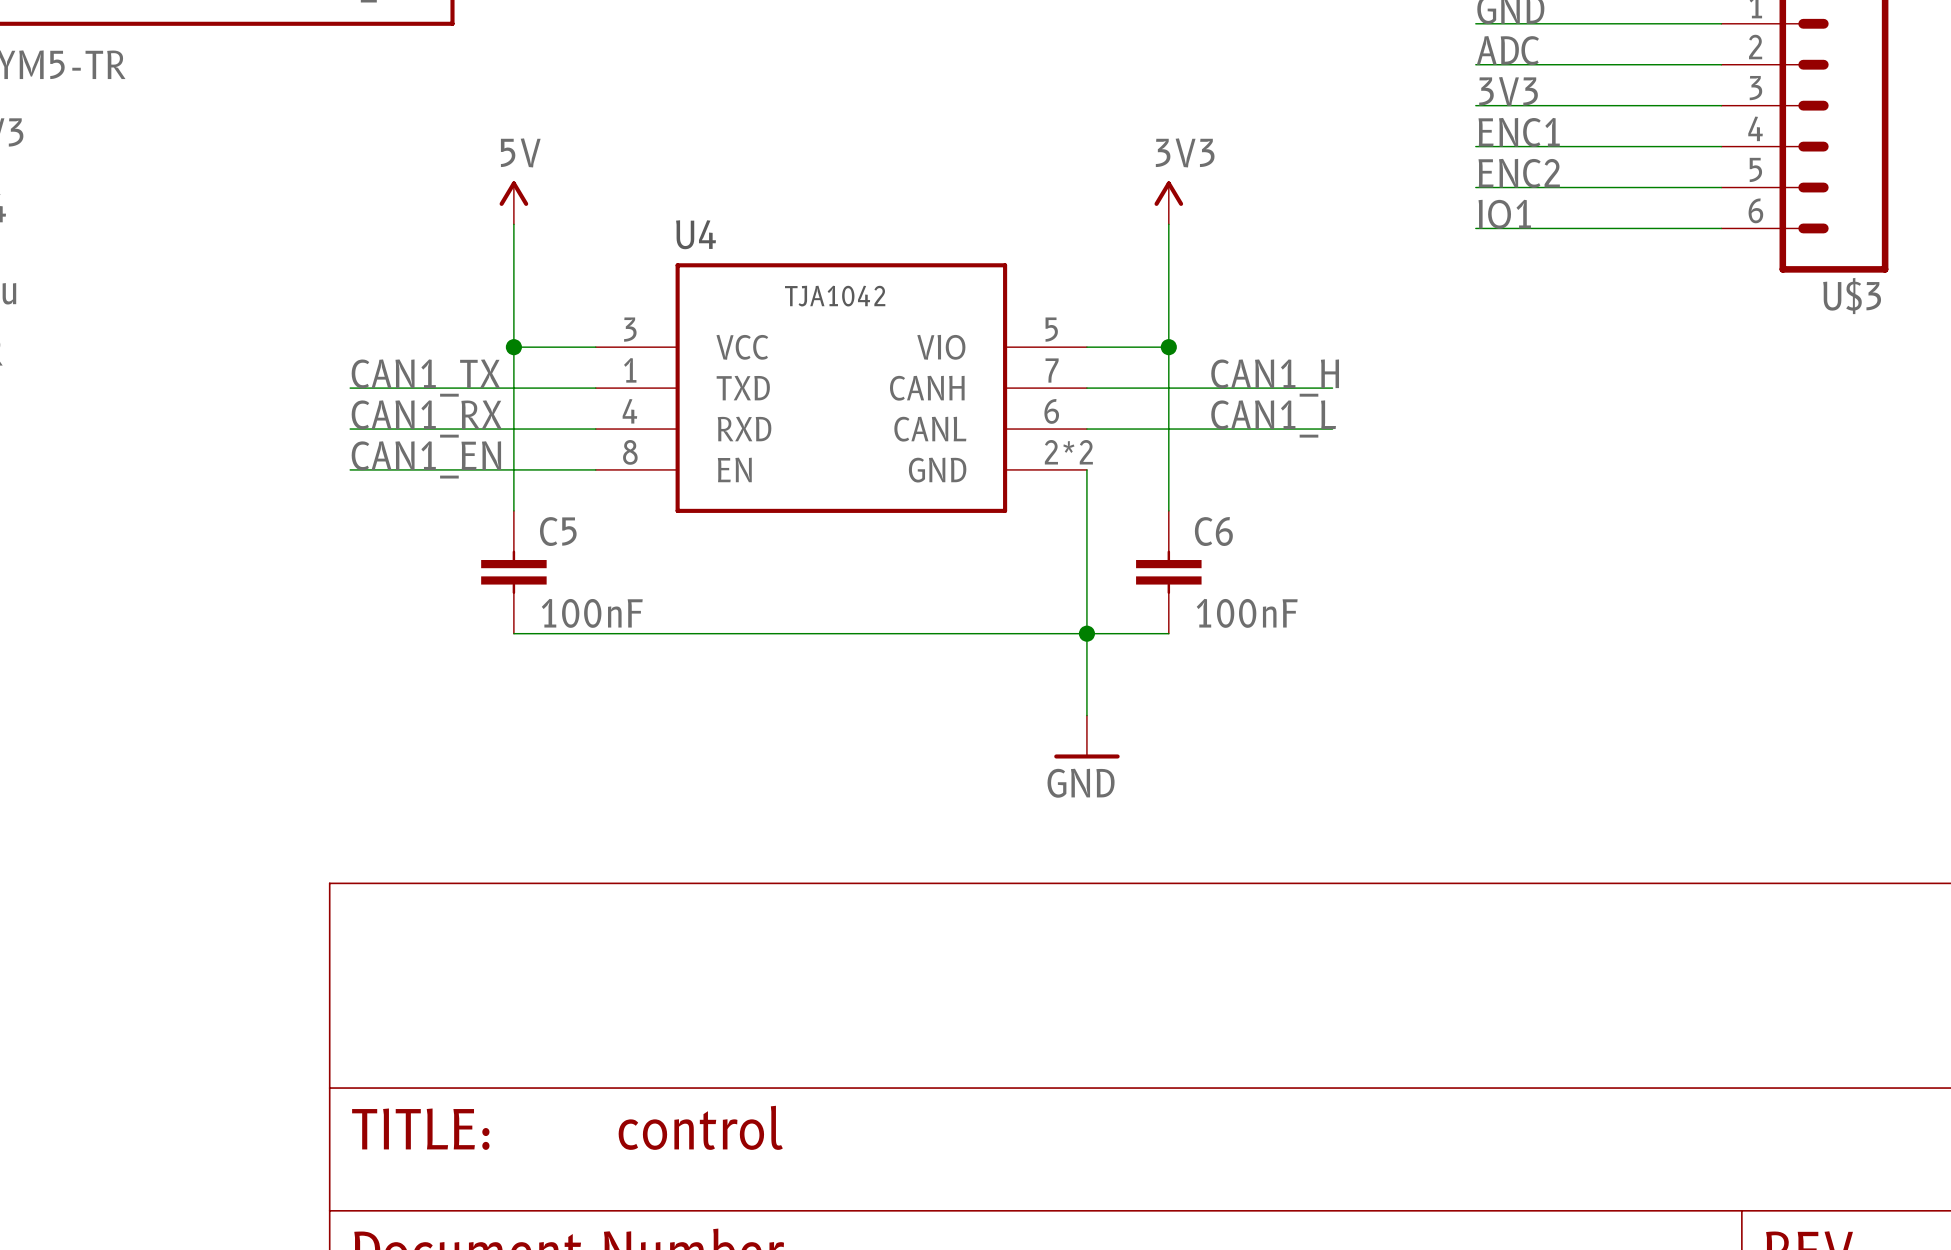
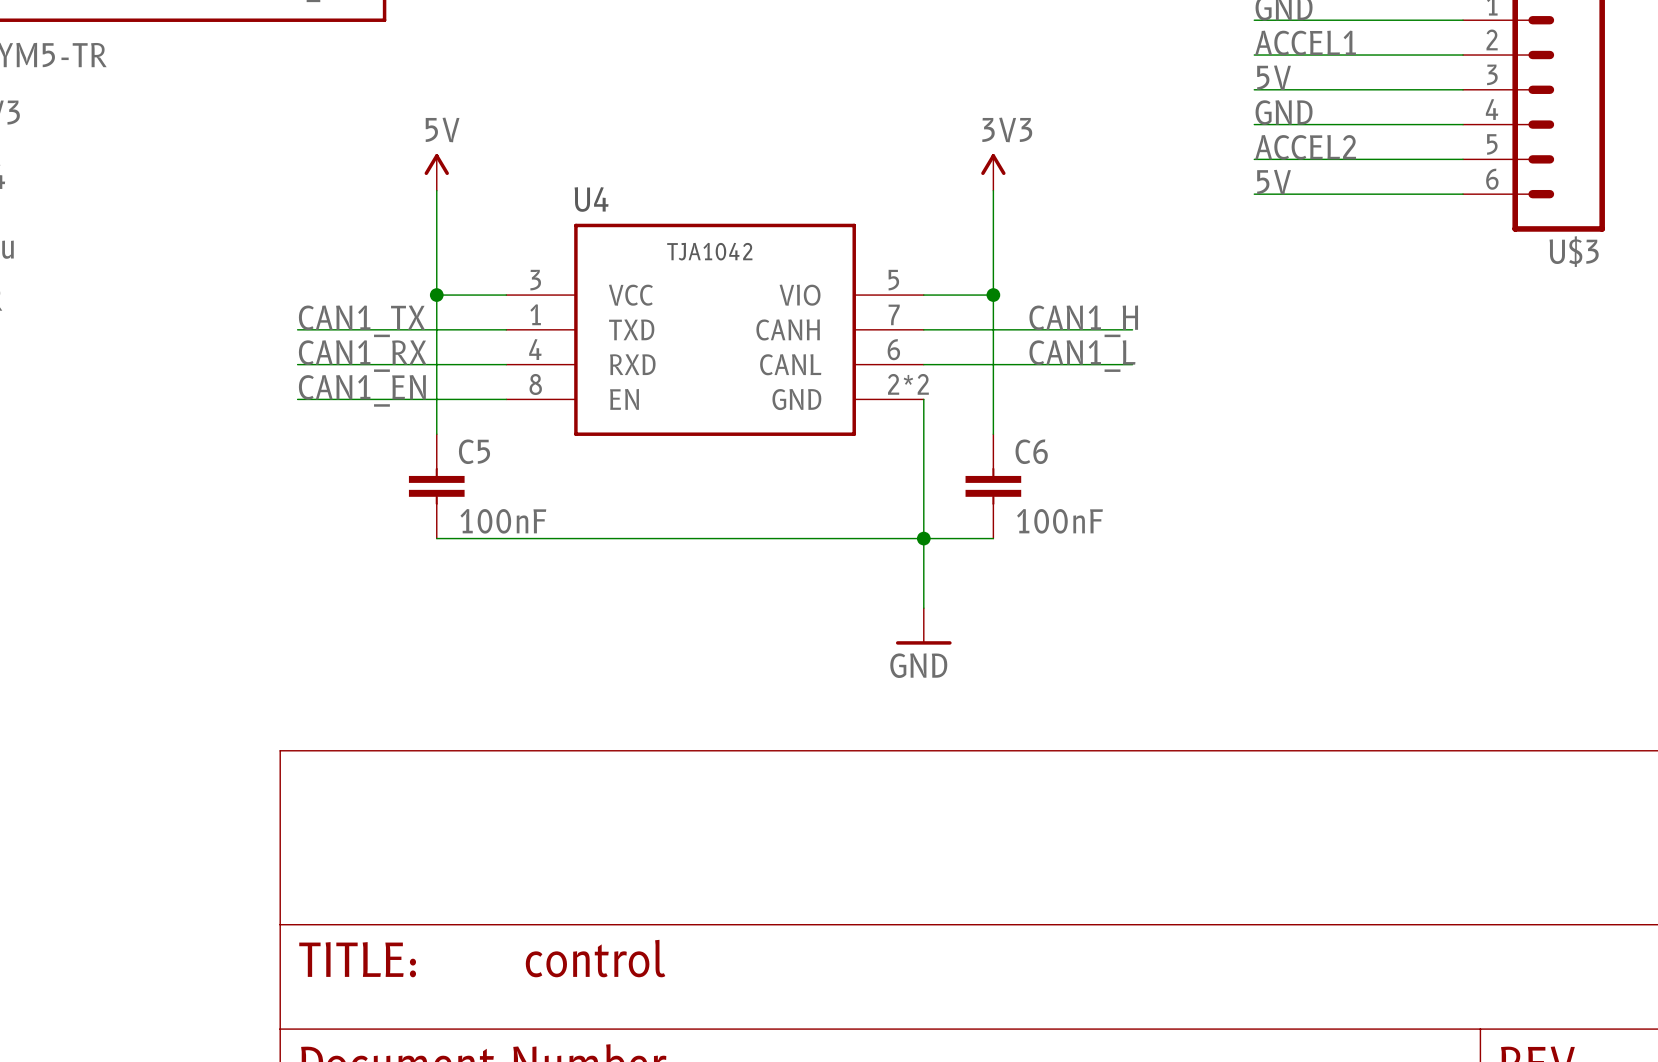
label: ADC (1507, 50) -> ACCEL1 (1305, 42)
label: 3V3 (1508, 91) -> 5V (1274, 77)
label: ENC1 (1519, 132) -> GND (1284, 112)
label: ENC2 (1519, 173) -> ACCEL2 (1305, 147)
label: IO1 (1504, 214) -> 5V (1274, 182)

